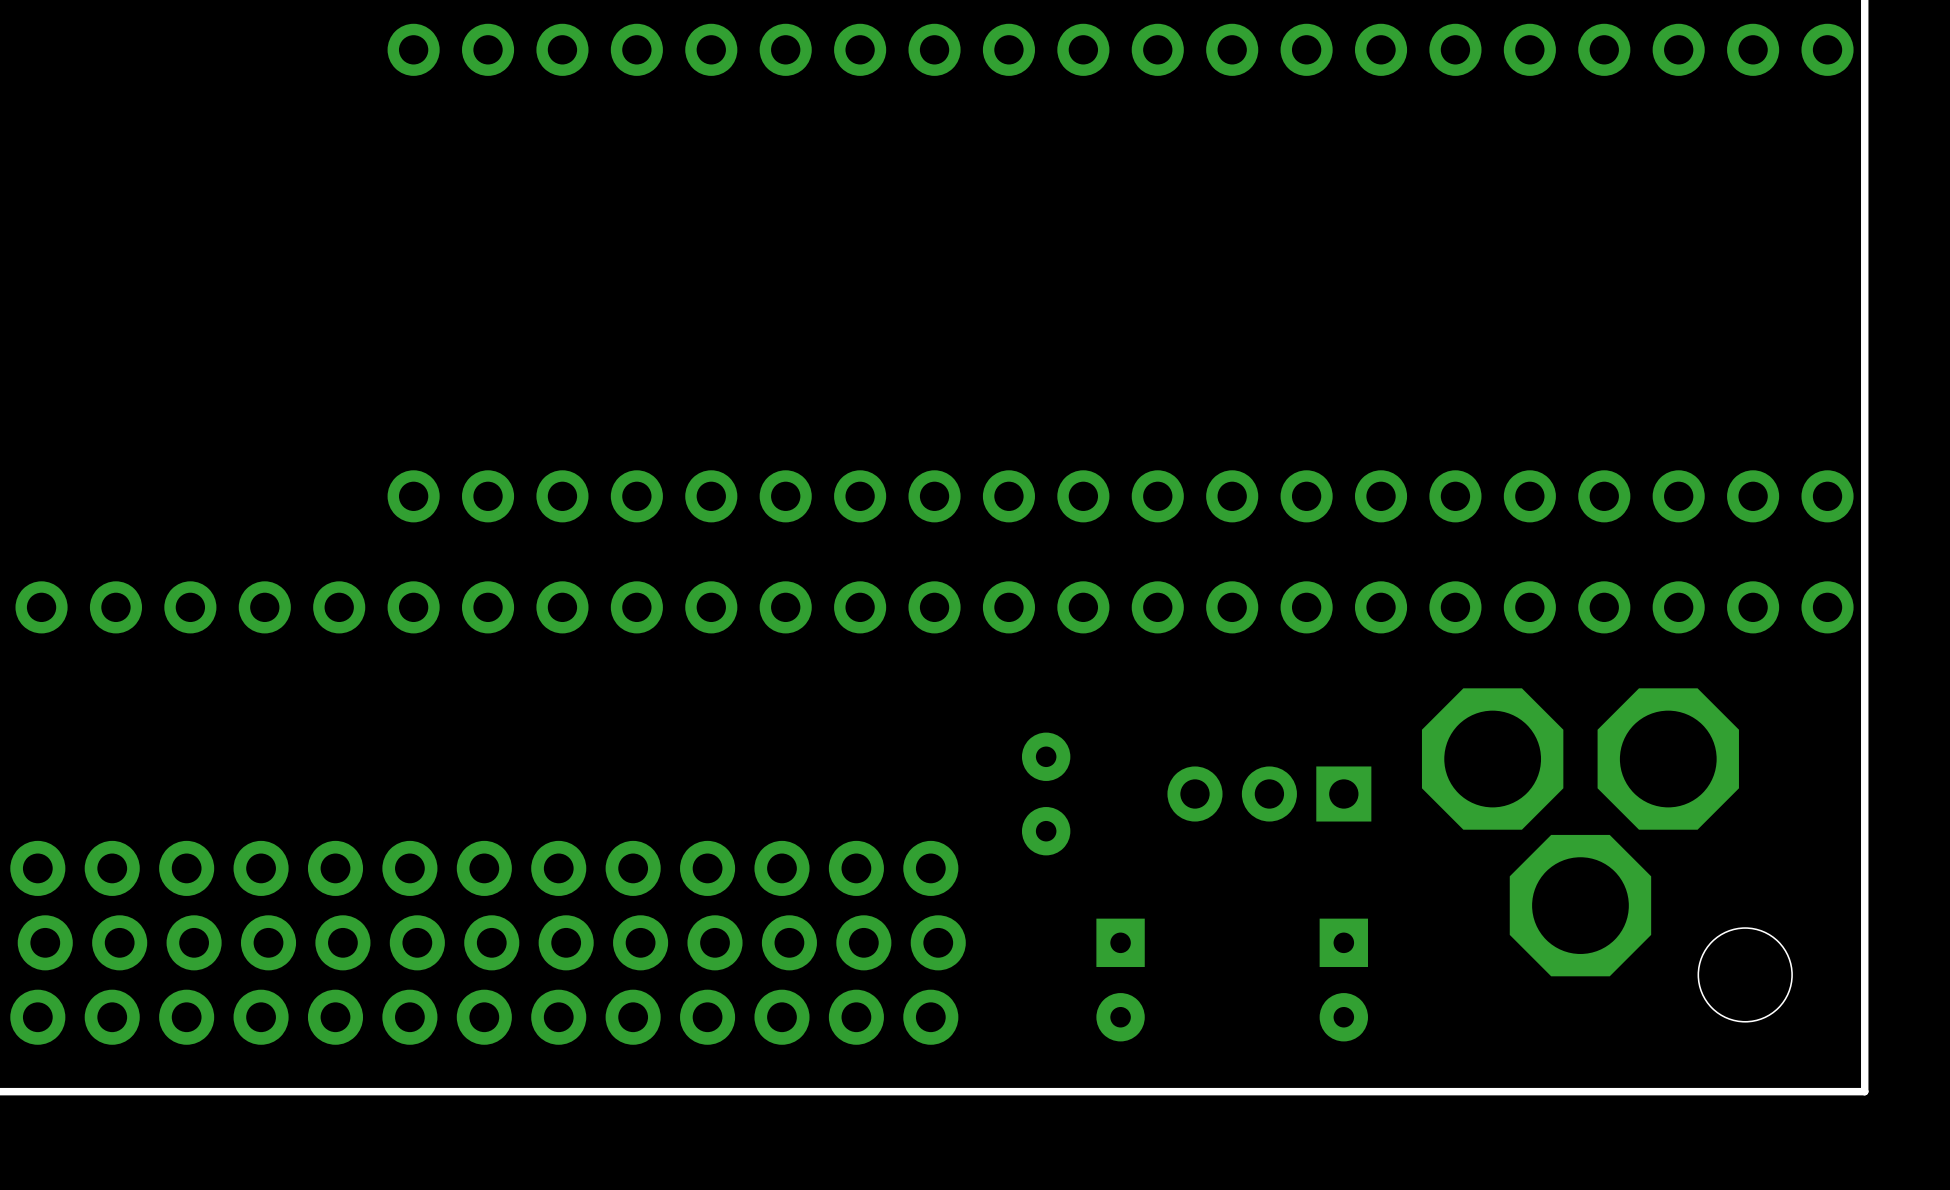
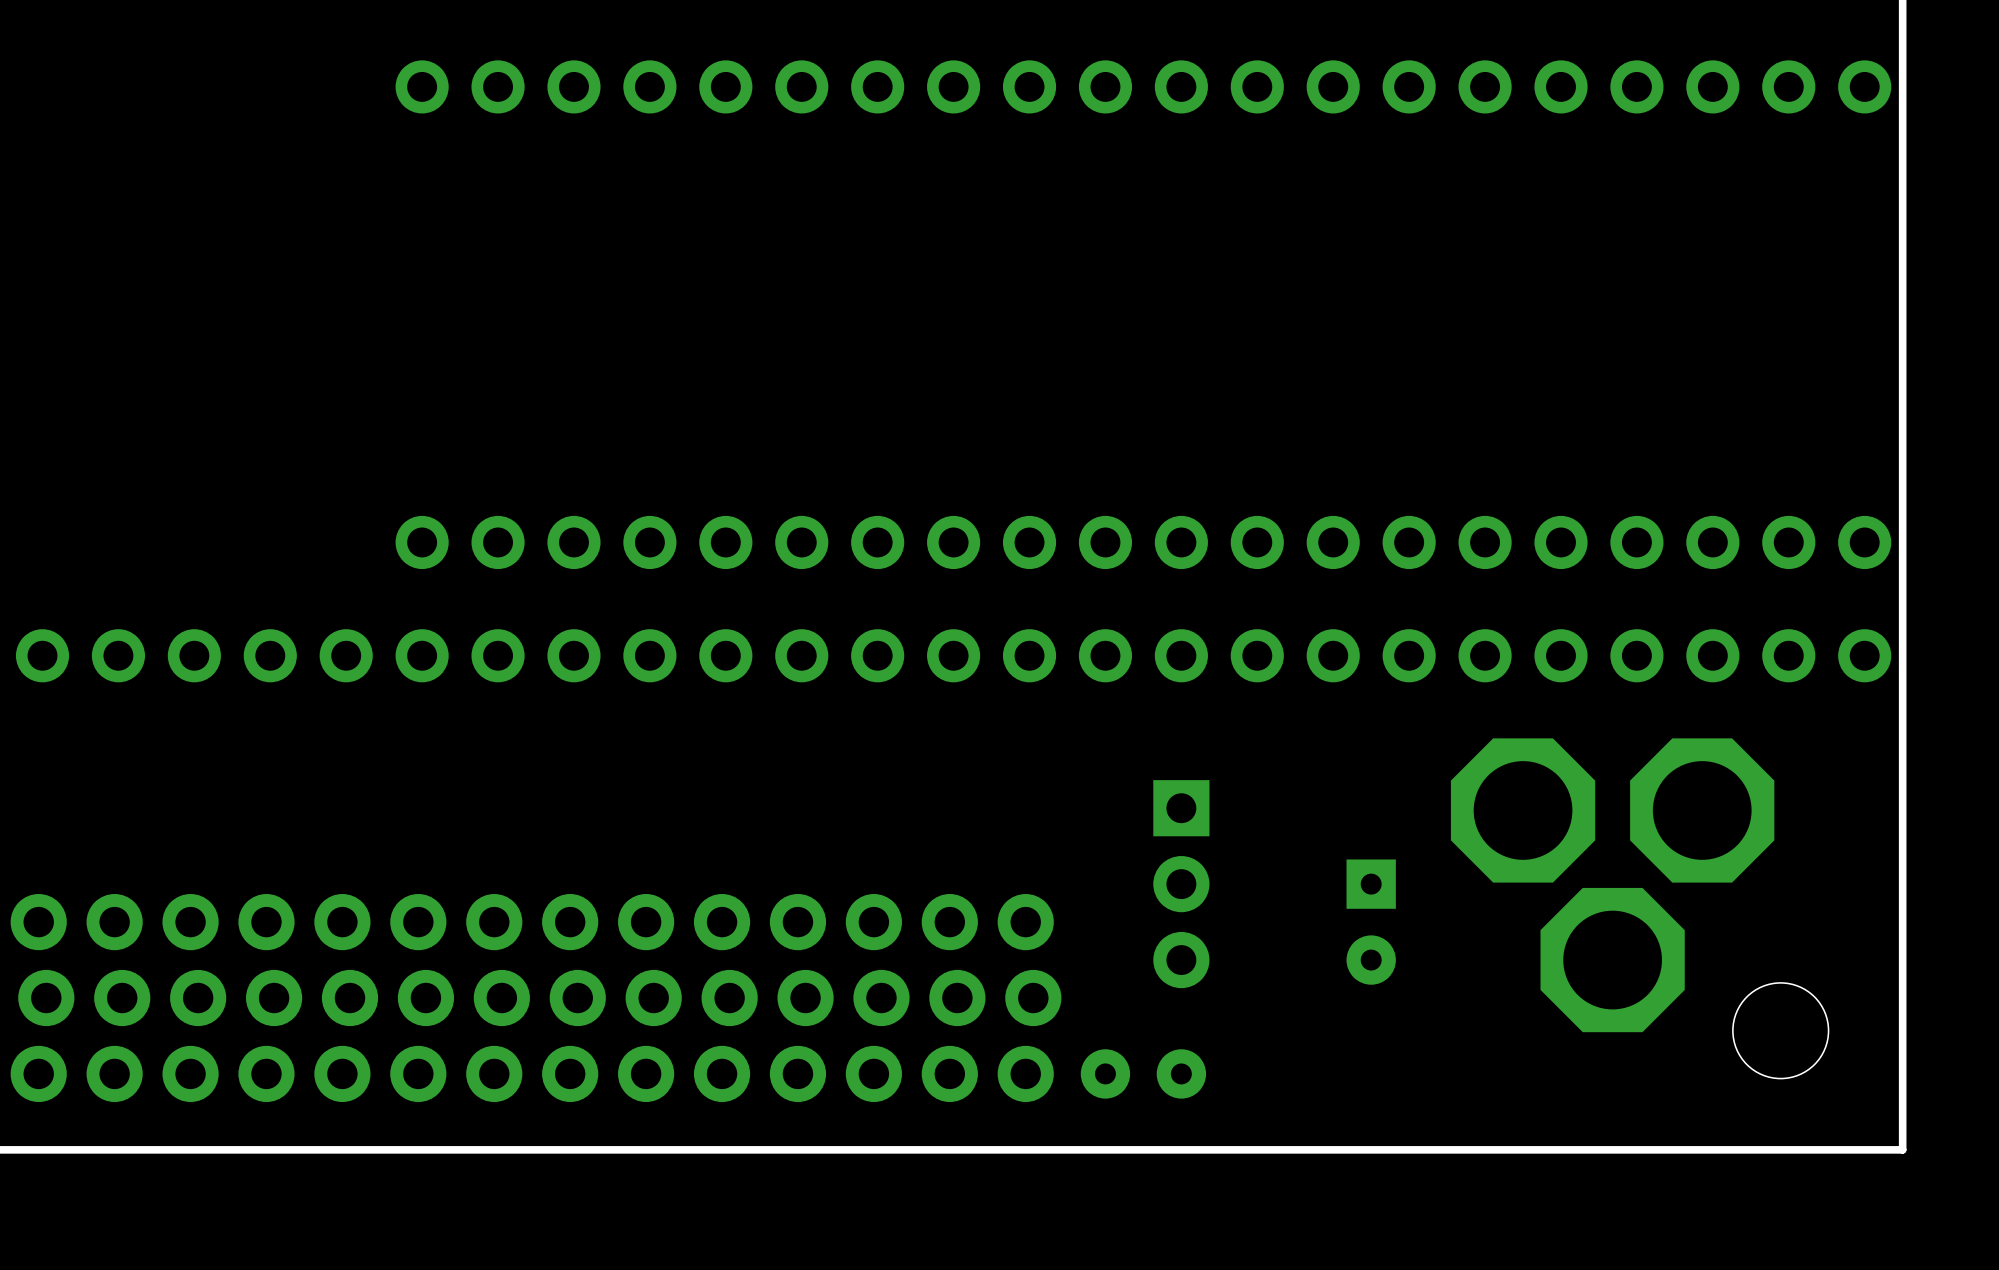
part rotation: 0° (1046, 793) -> 90° clockwise (1143, 1073)
part position: (1046, 793) -> (1143, 1073)
part rotation: 0° (1269, 793) -> 90° counterclockwise (1181, 884)
part: none -> (1029, 998)
part: (1120, 980) -> none
part position: (1343, 980) -> (1371, 922)

